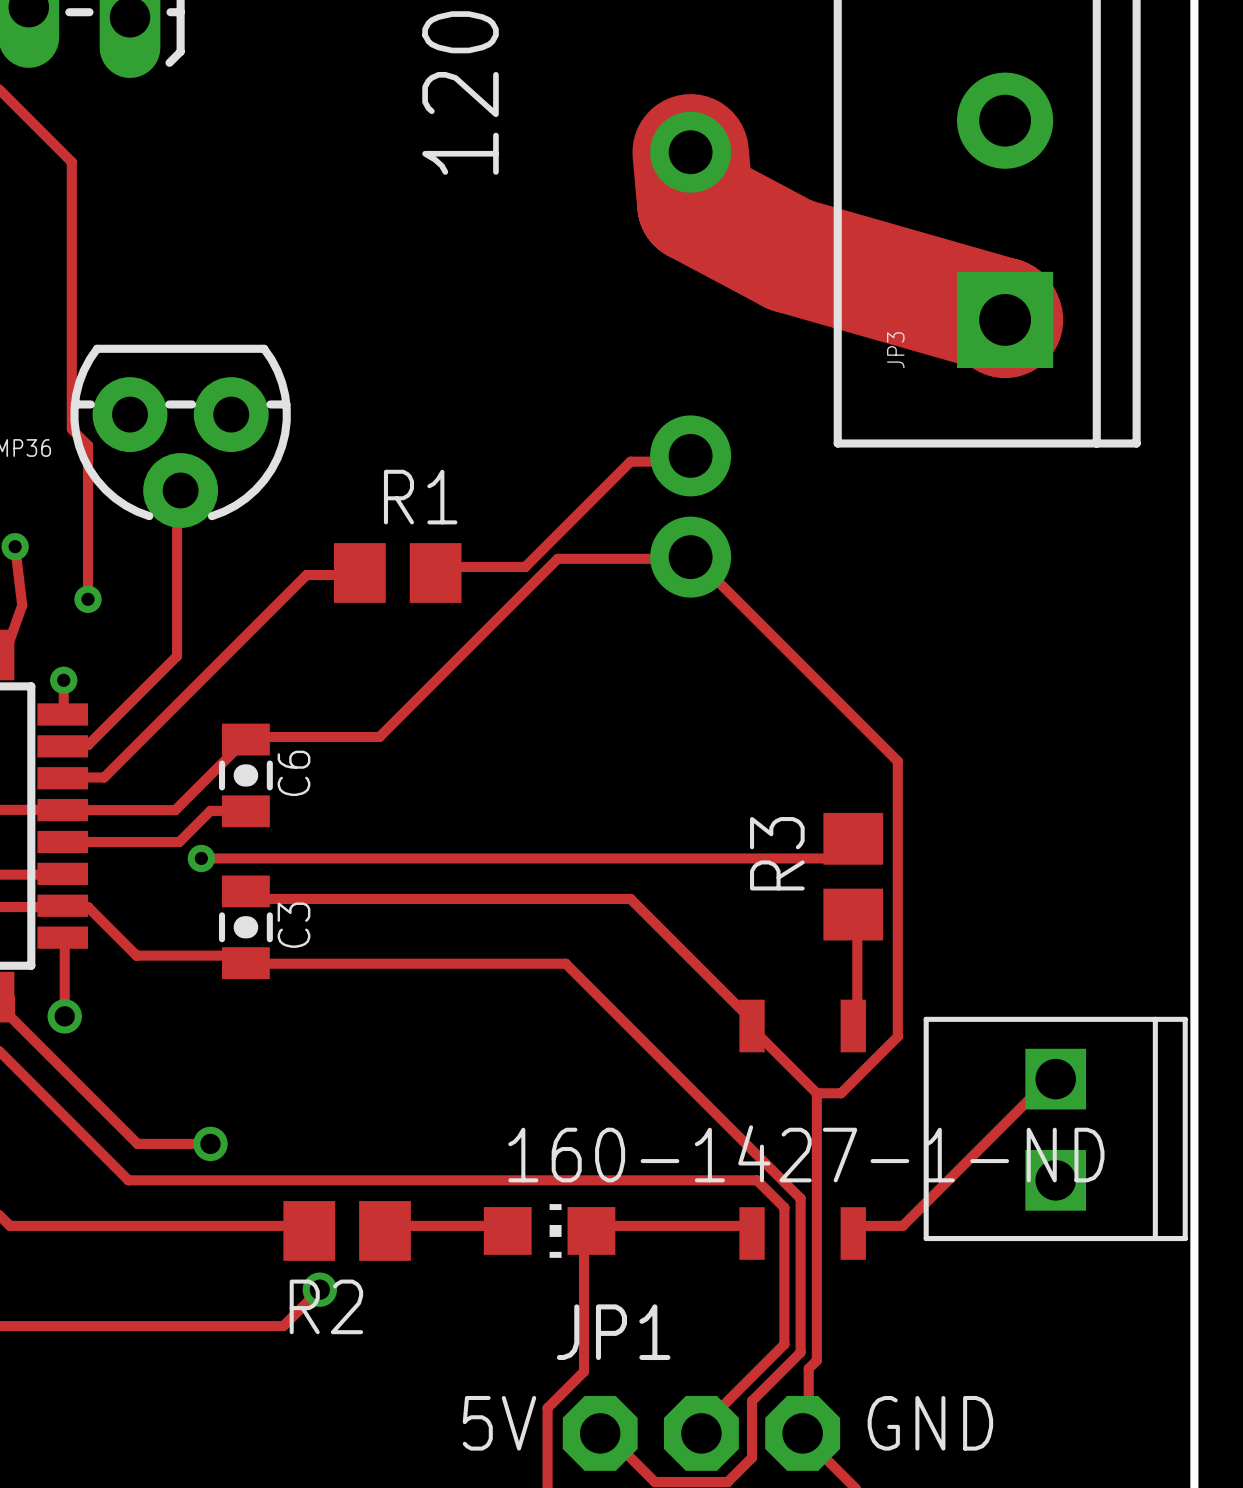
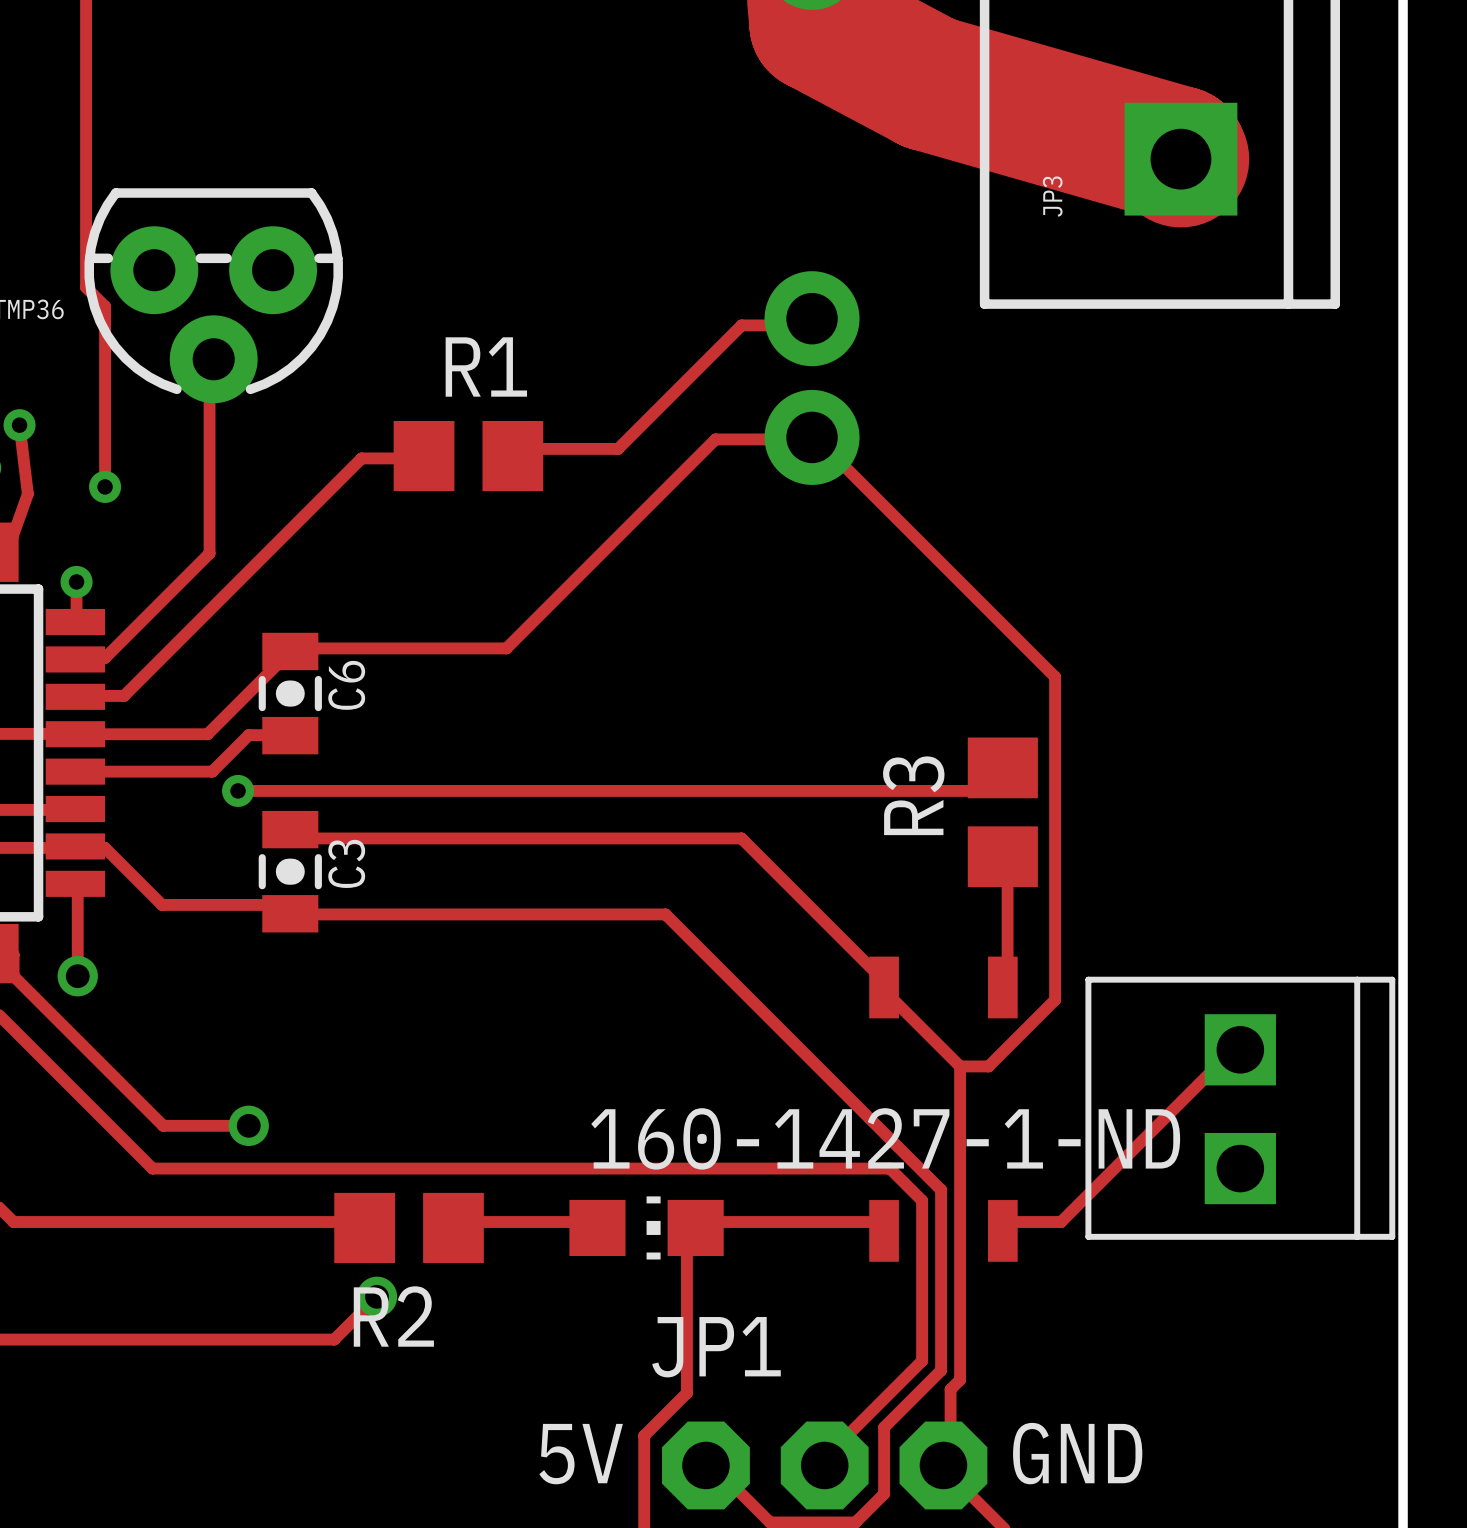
track: (608, 558) (557, 558) (379, 736) -> (715, 439) (506, 648) (447, 648)

